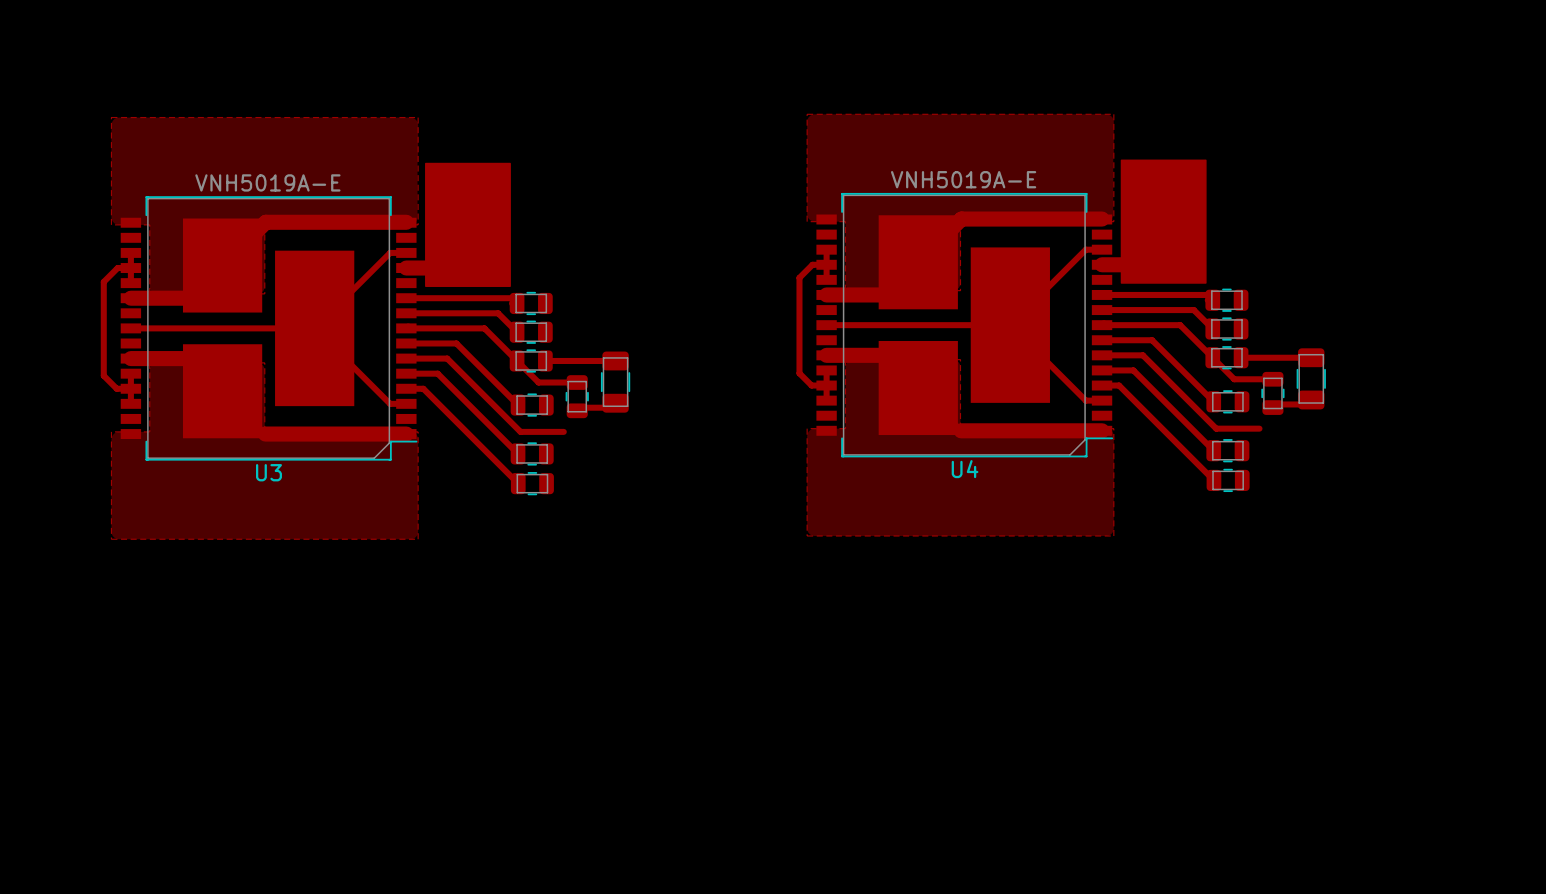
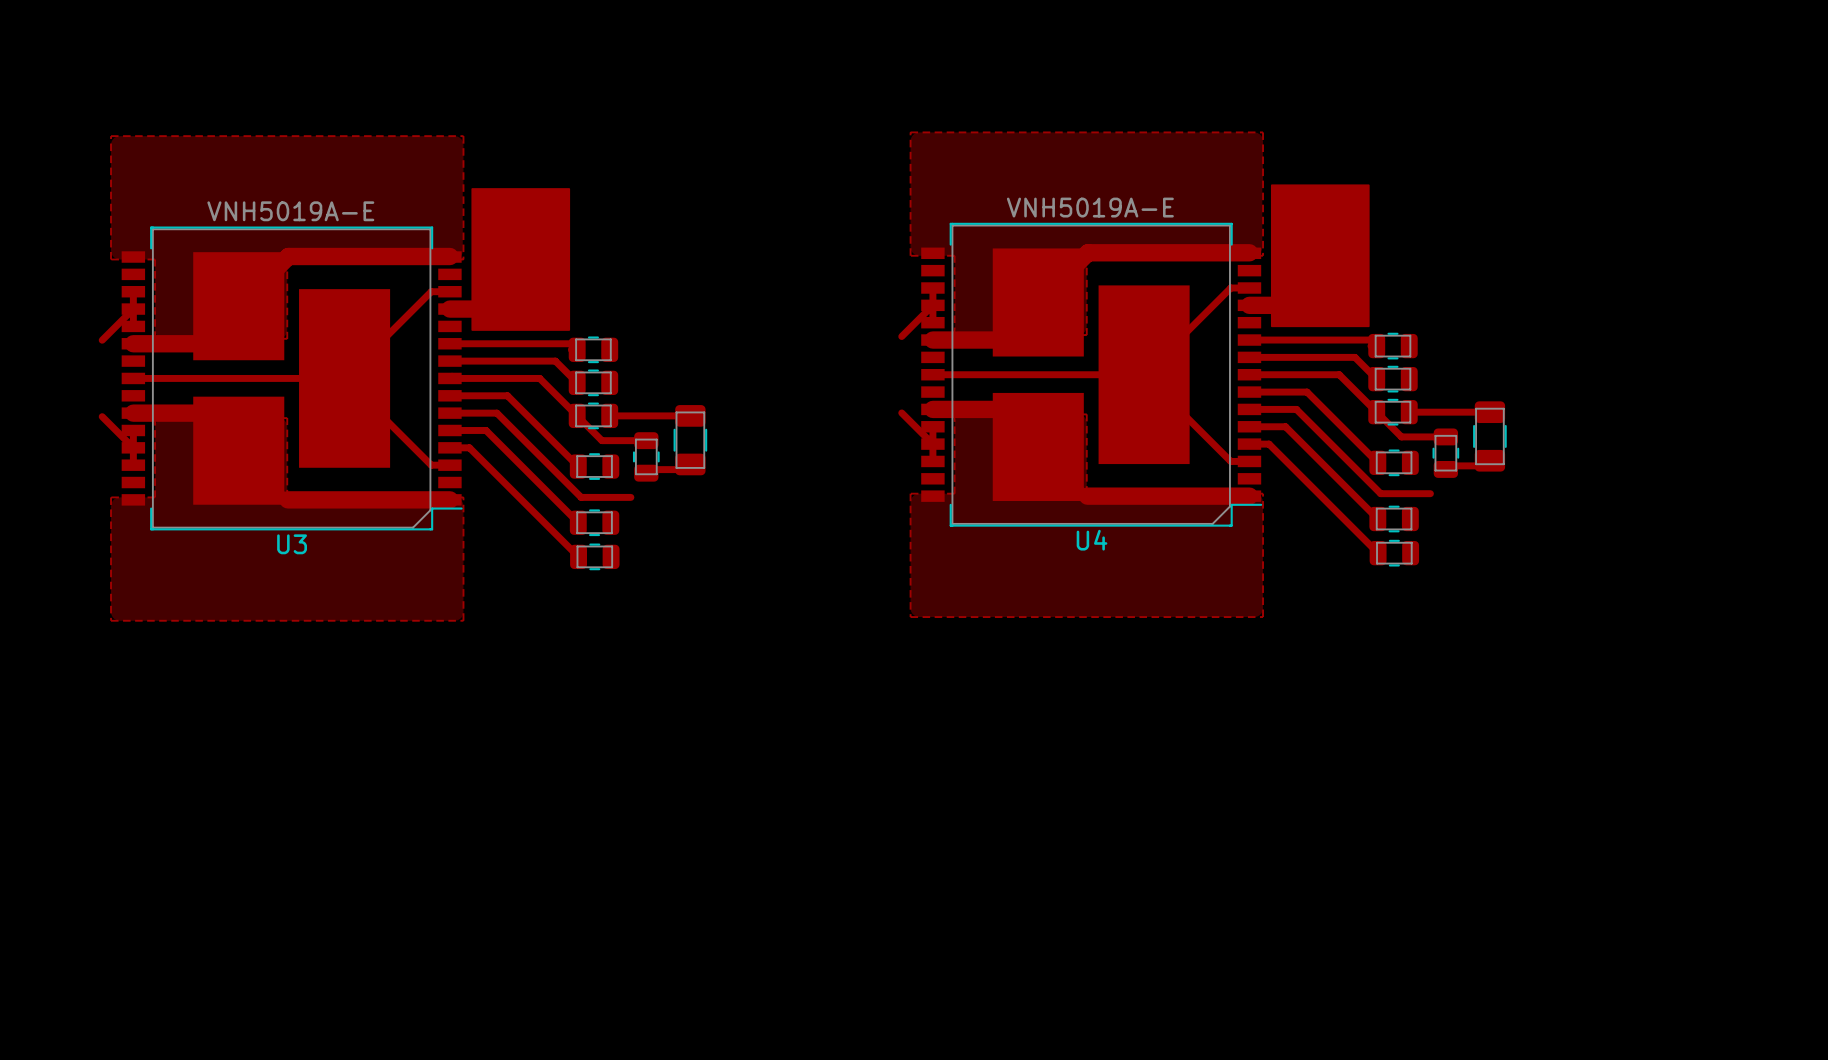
top track: (826, 264) (812, 264) (799, 277) (799, 373) (811, 385) (826, 385) -> (932, 305) (901, 336)
top track: (130, 268) (117, 268) (103, 281) (103, 375) (116, 388) (130, 388) -> (102, 416) (133, 447)
top track: none -> (133, 309) (102, 340)
top track: none -> (901, 412) (932, 444)

